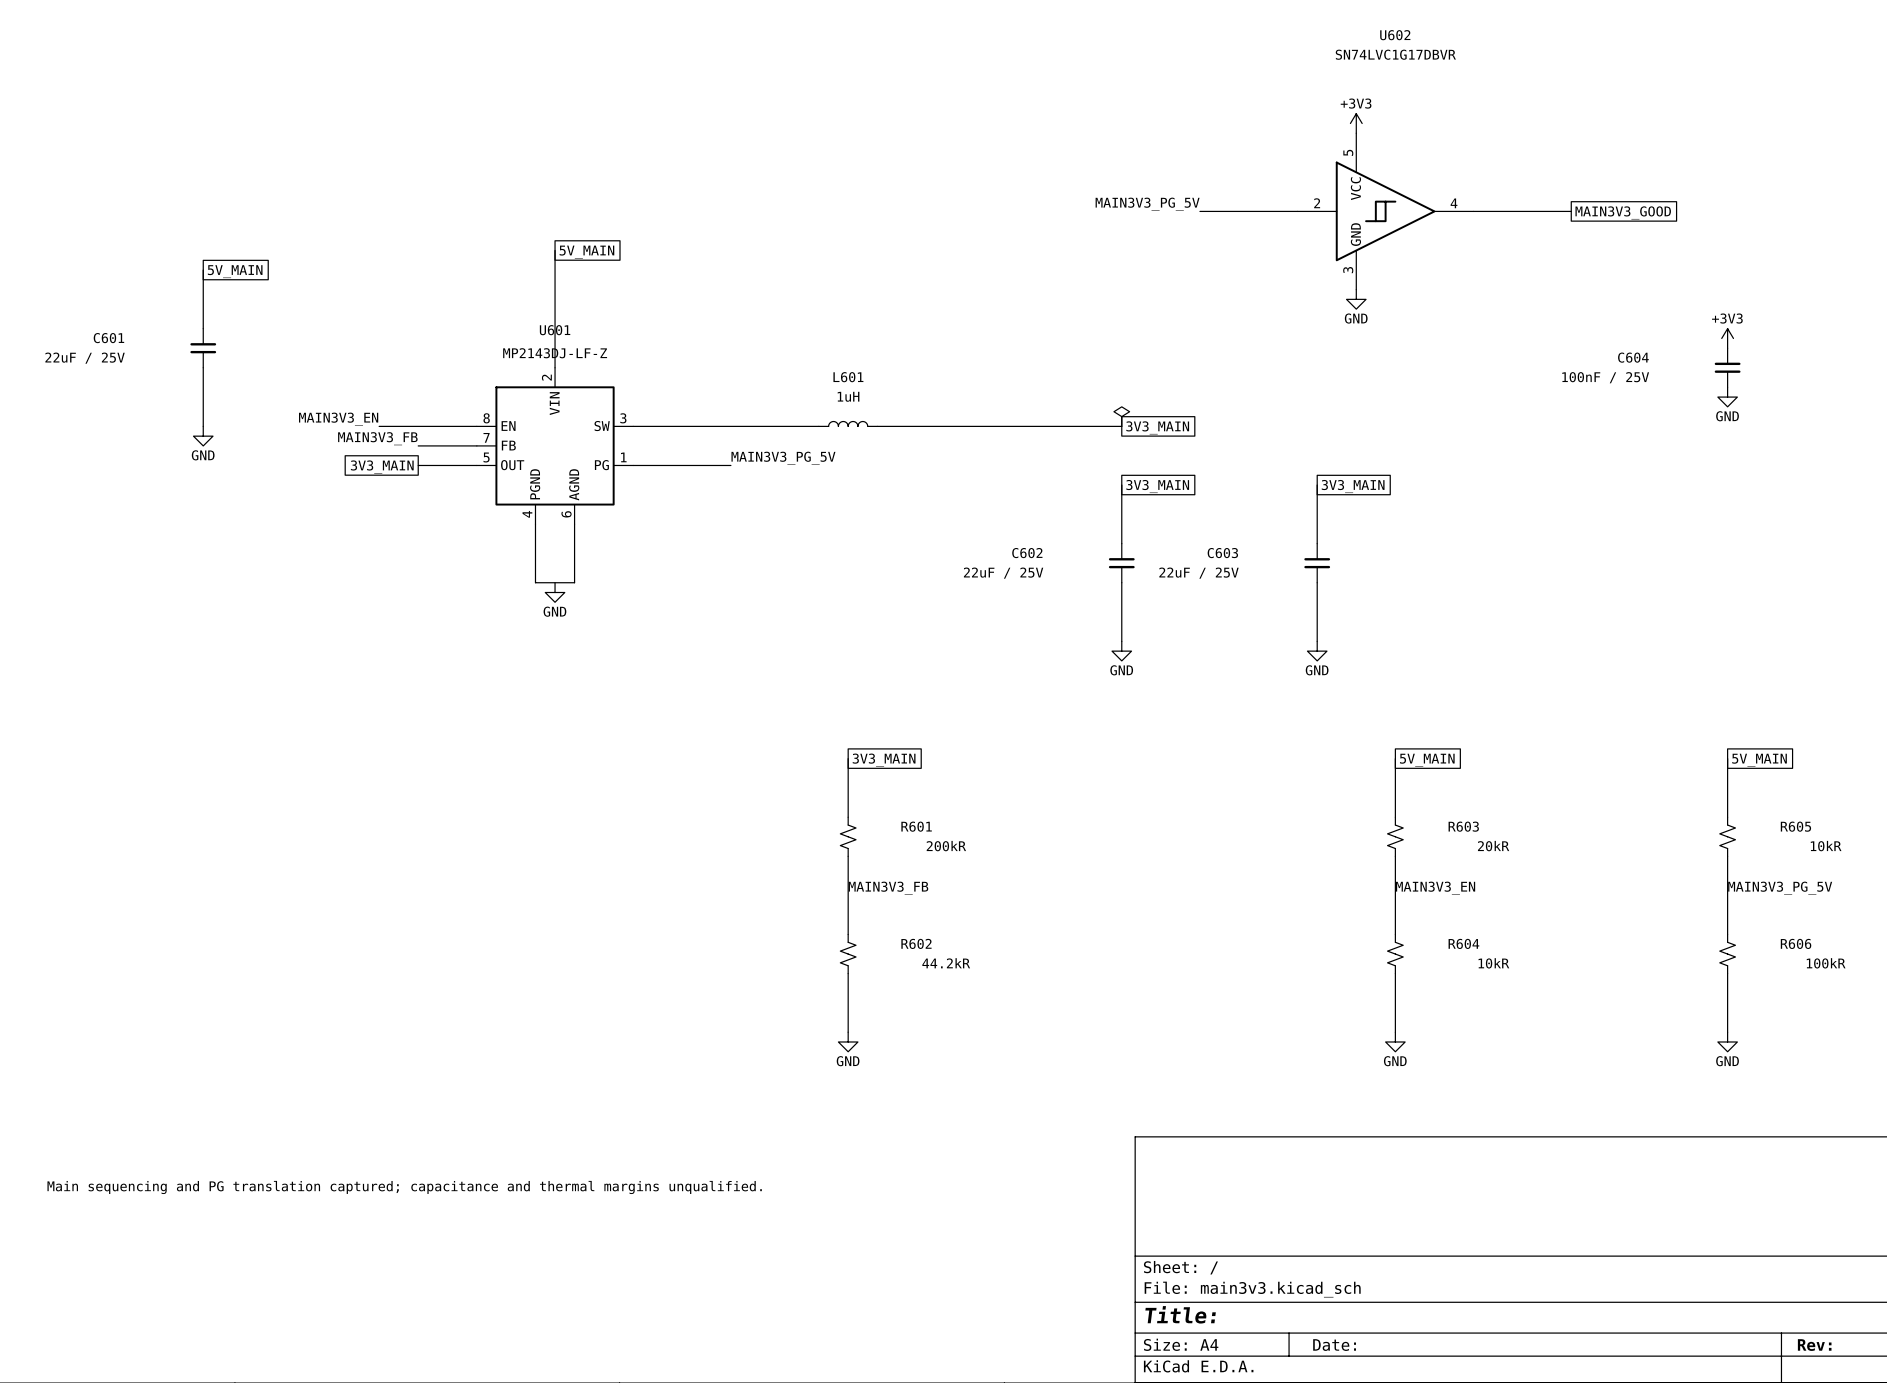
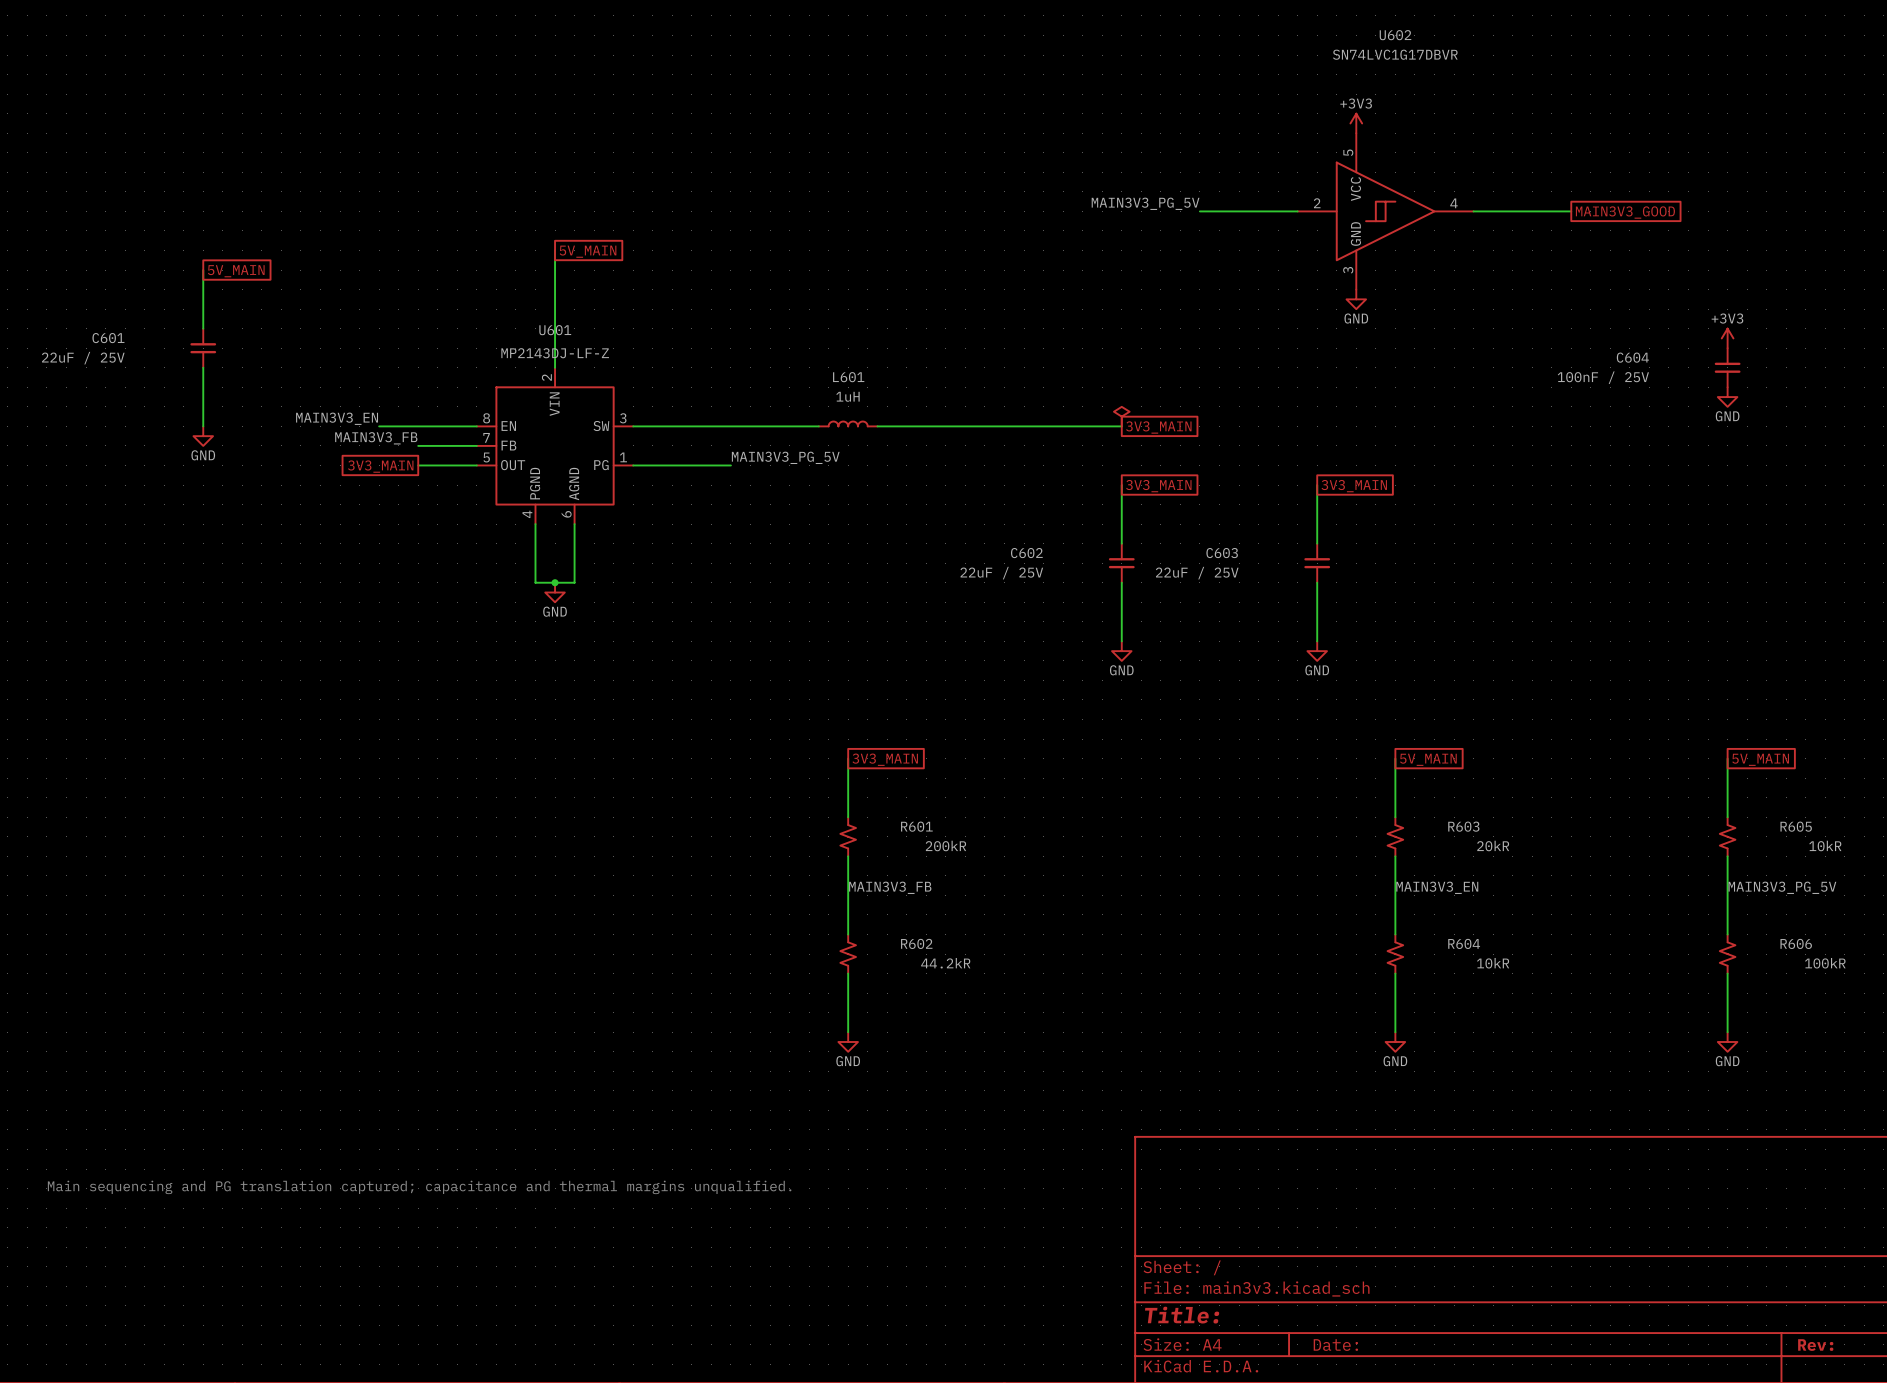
junction: none -> (555, 582)

